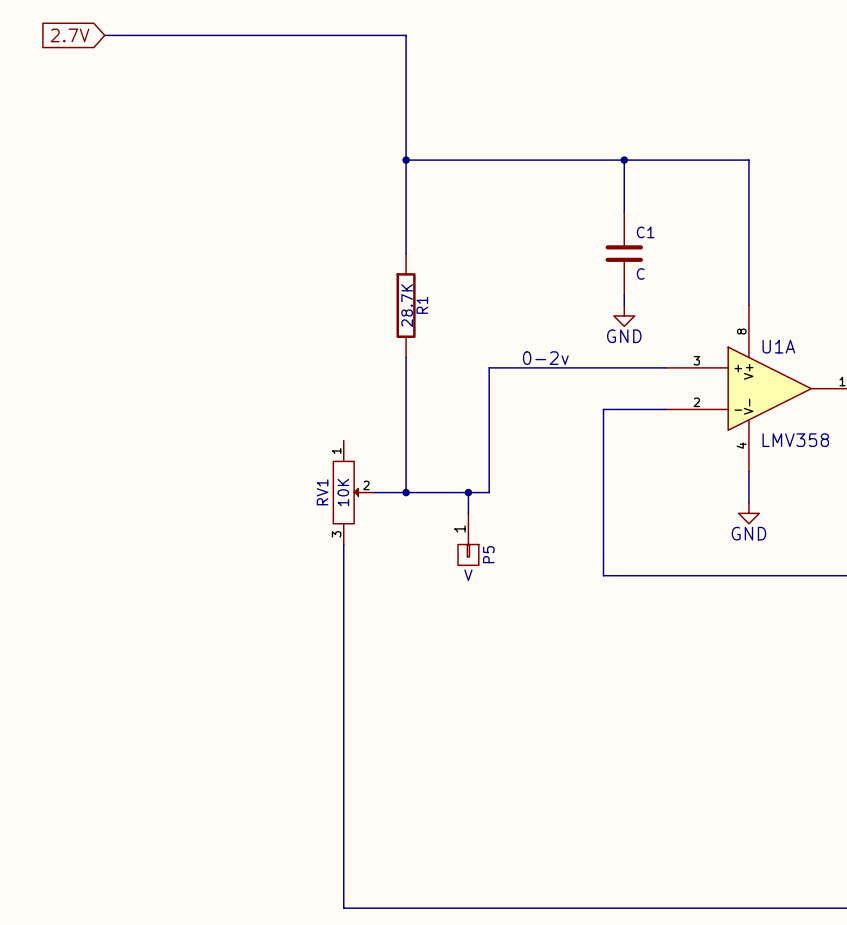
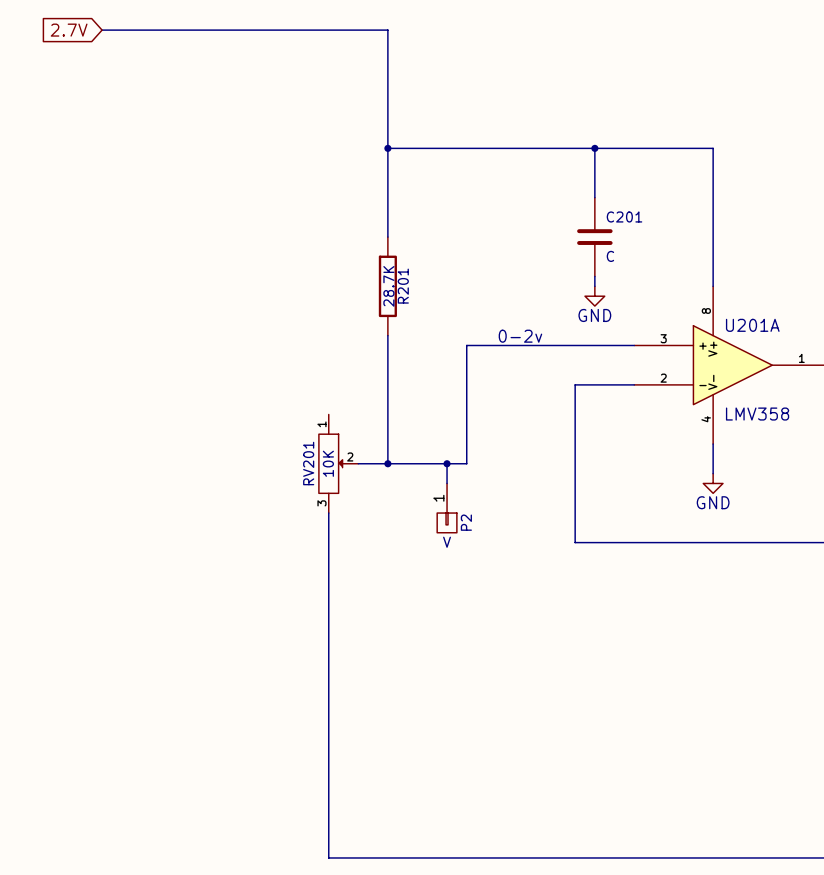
C1 name: C1 (645, 232) -> C201 (624, 216)
R1 name: R1 (422, 305) -> R201 (403, 286)
U1A name: U1A (778, 346) -> U201A (752, 325)
RV1 name: RV1 (322, 492) -> RV201 (308, 463)
P5 name: P5 (488, 554) -> P2 (466, 522)

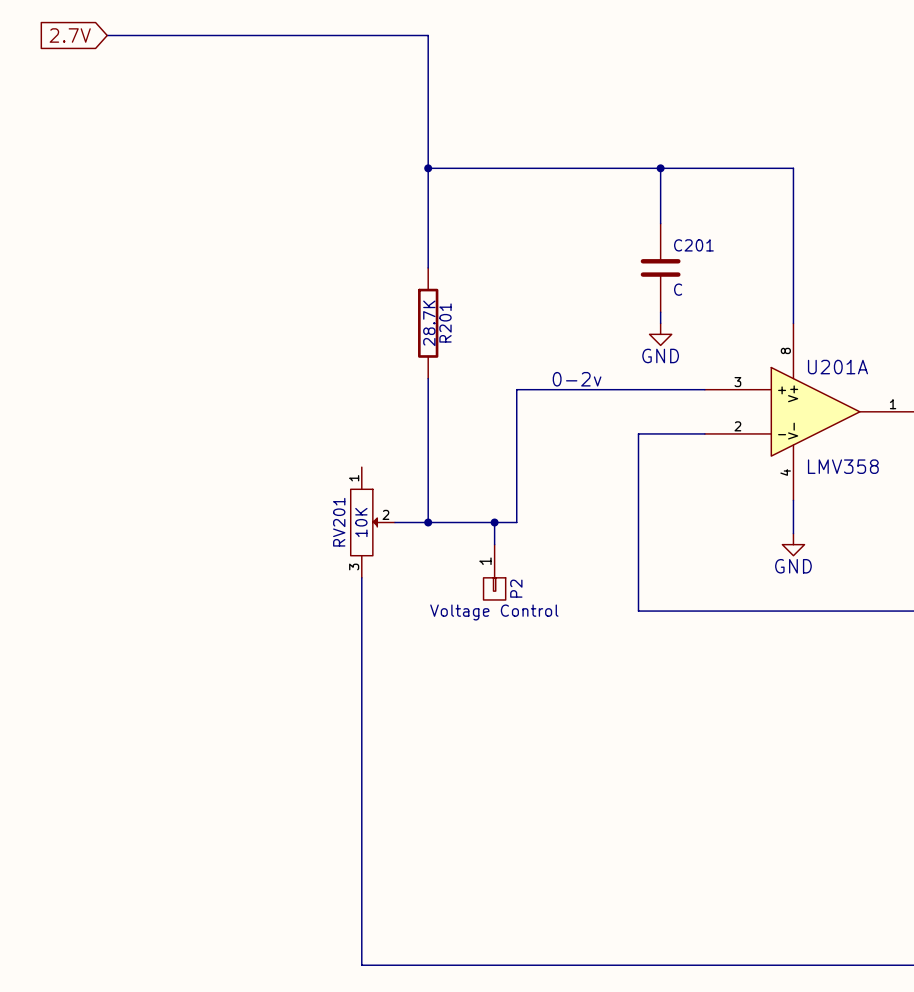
P2 value: V (447, 542) -> Voltage Control (494, 612)

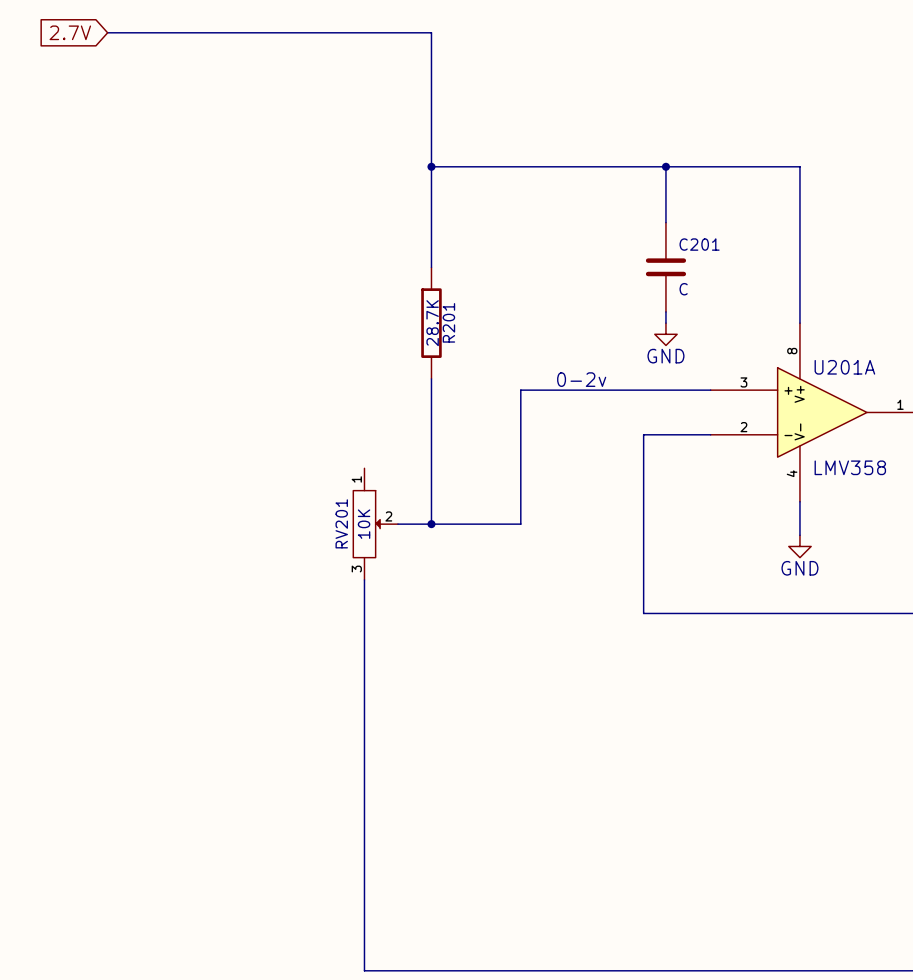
wire: (494, 522) (494, 544) -> none
junction: (494, 522) -> none
P2: Voltage Control (494, 572) -> none

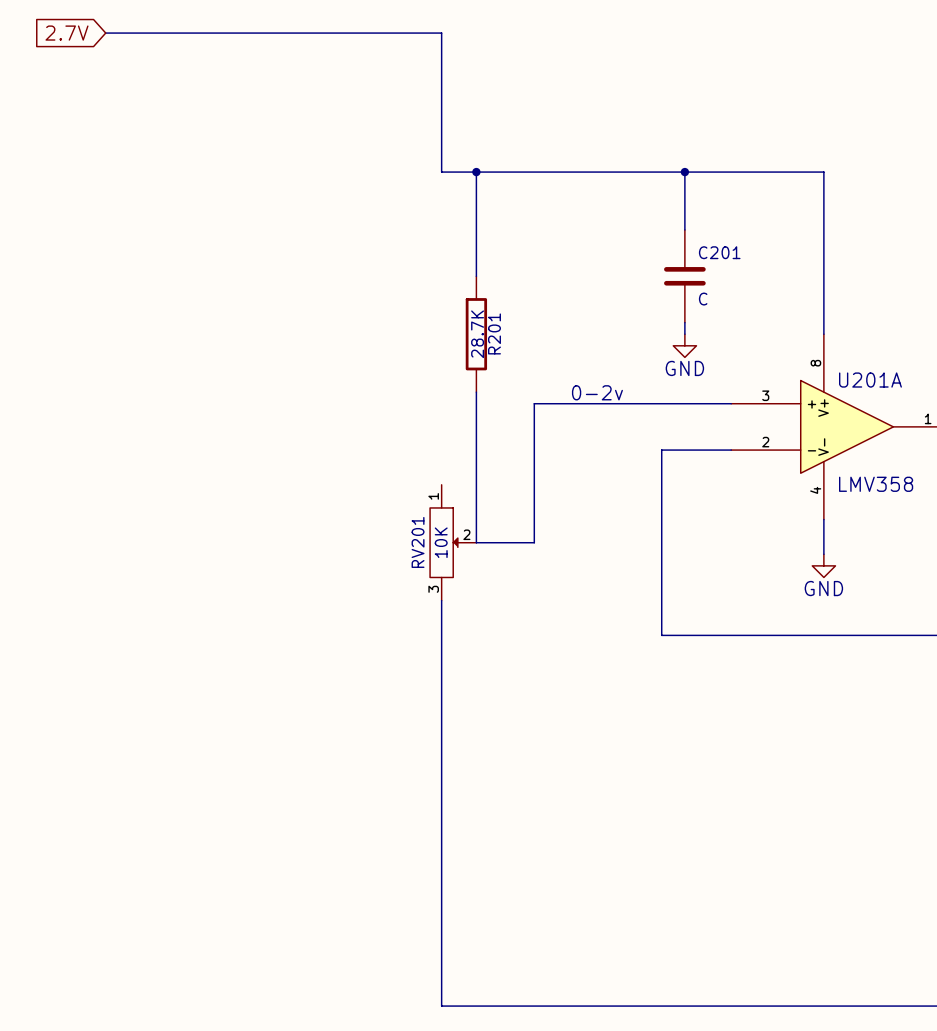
wire: (431, 166) (431, 267) -> (476, 172) (476, 276)
junction position: (431, 166) -> (476, 172)
R201 position: (431, 323) -> (476, 334)
wire: (431, 378) (431, 524) -> none
RV201 position: (375, 524) -> (453, 542)
wire: (397, 524) (464, 524) -> (476, 392) (476, 542)
junction: (431, 524) -> none
wire: (364, 579) (364, 970) (431, 970) -> (441, 600) (441, 1006)

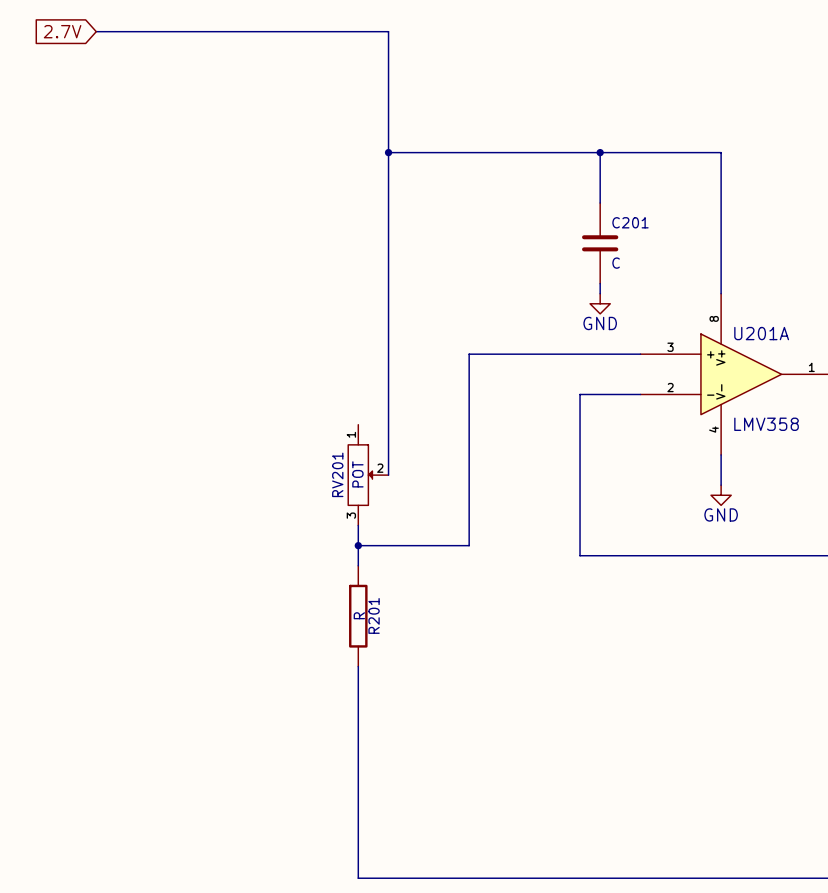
wire: none -> (388, 152) (388, 475)
wire: (476, 172) (476, 276) -> none
junction position: (476, 172) -> (388, 152)
R201 position: (476, 334) -> (358, 616)
R201 value: 28.7K (477, 334) -> R (359, 615)
wire: (476, 392) (476, 542) (534, 542) -> (358, 545) (469, 545) (469, 475)
text: 0-2v (597, 392) -> none
RV201 value: 10K (441, 542) -> POT (357, 474)
RV201 position: (453, 542) -> (368, 475)
wire: none -> (358, 525) (358, 565)
wire: (441, 600) (441, 1006) -> (358, 666) (358, 878) (388, 878)
junction: none -> (358, 545)

